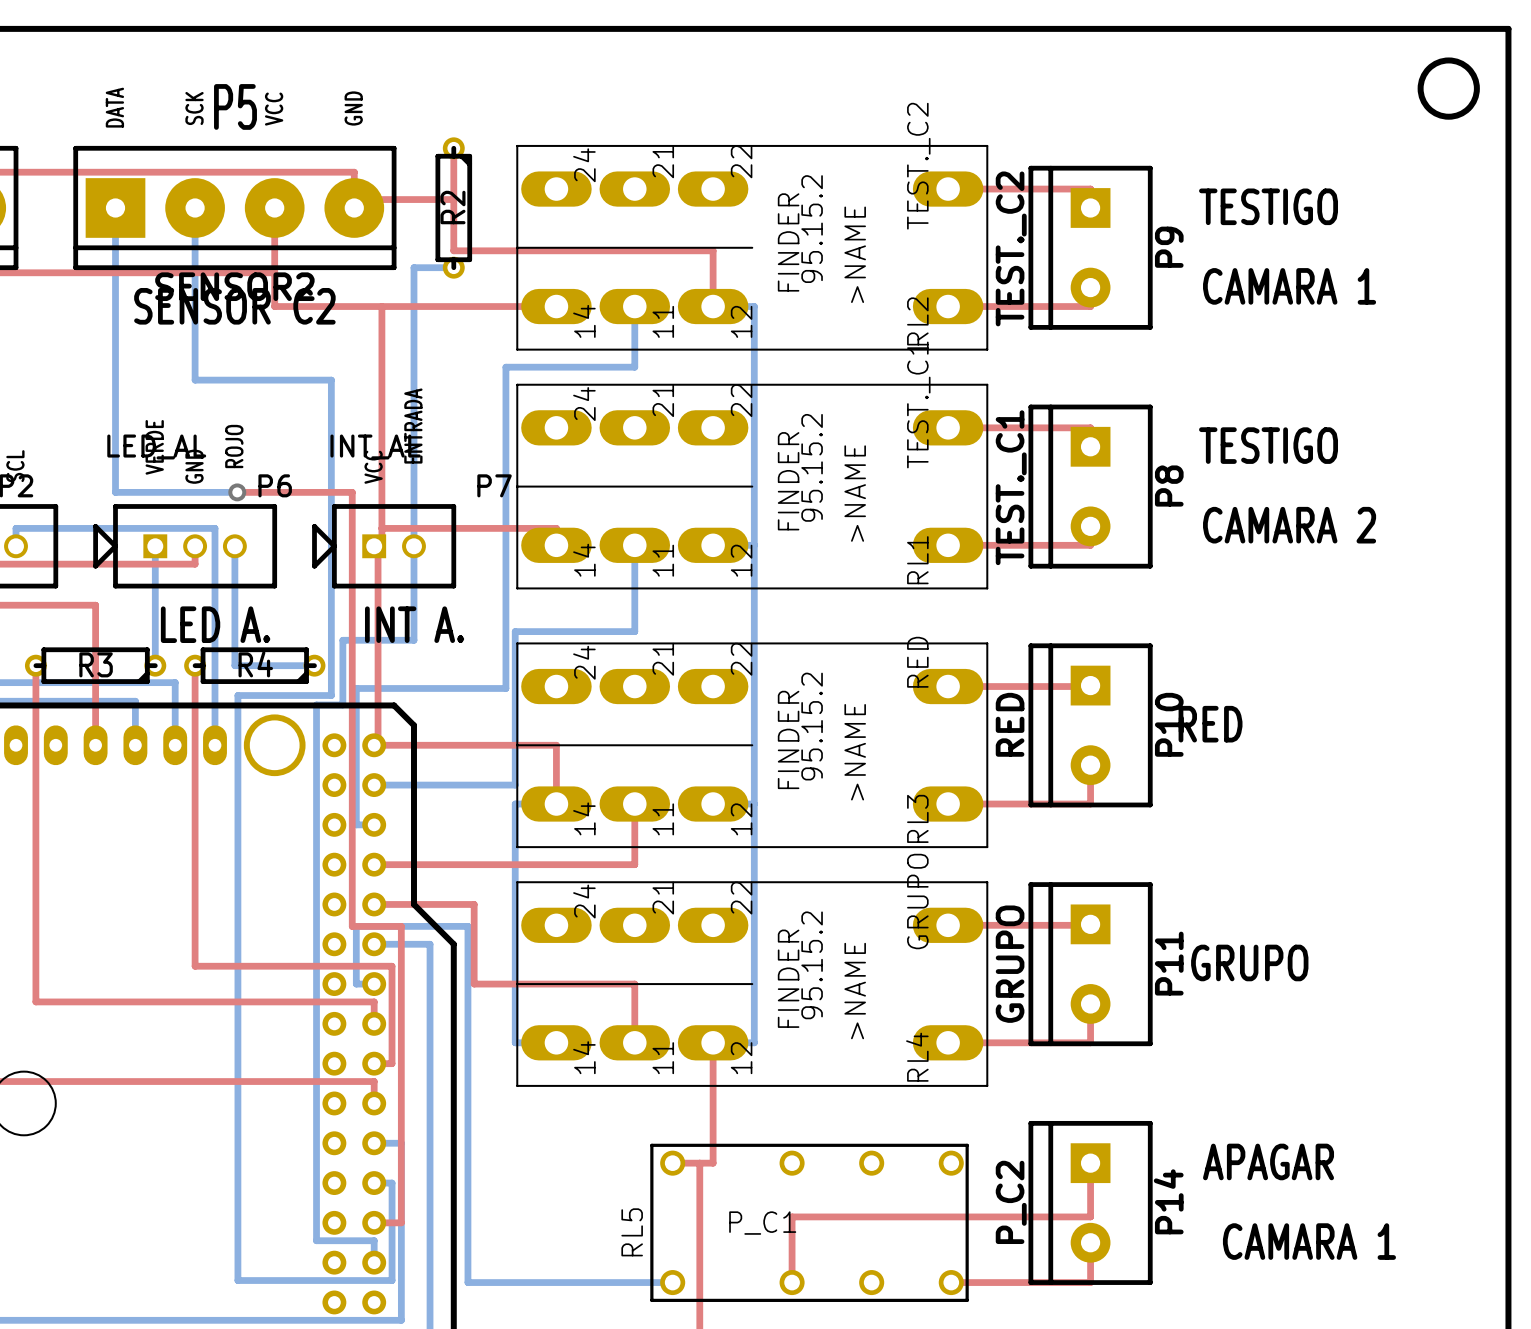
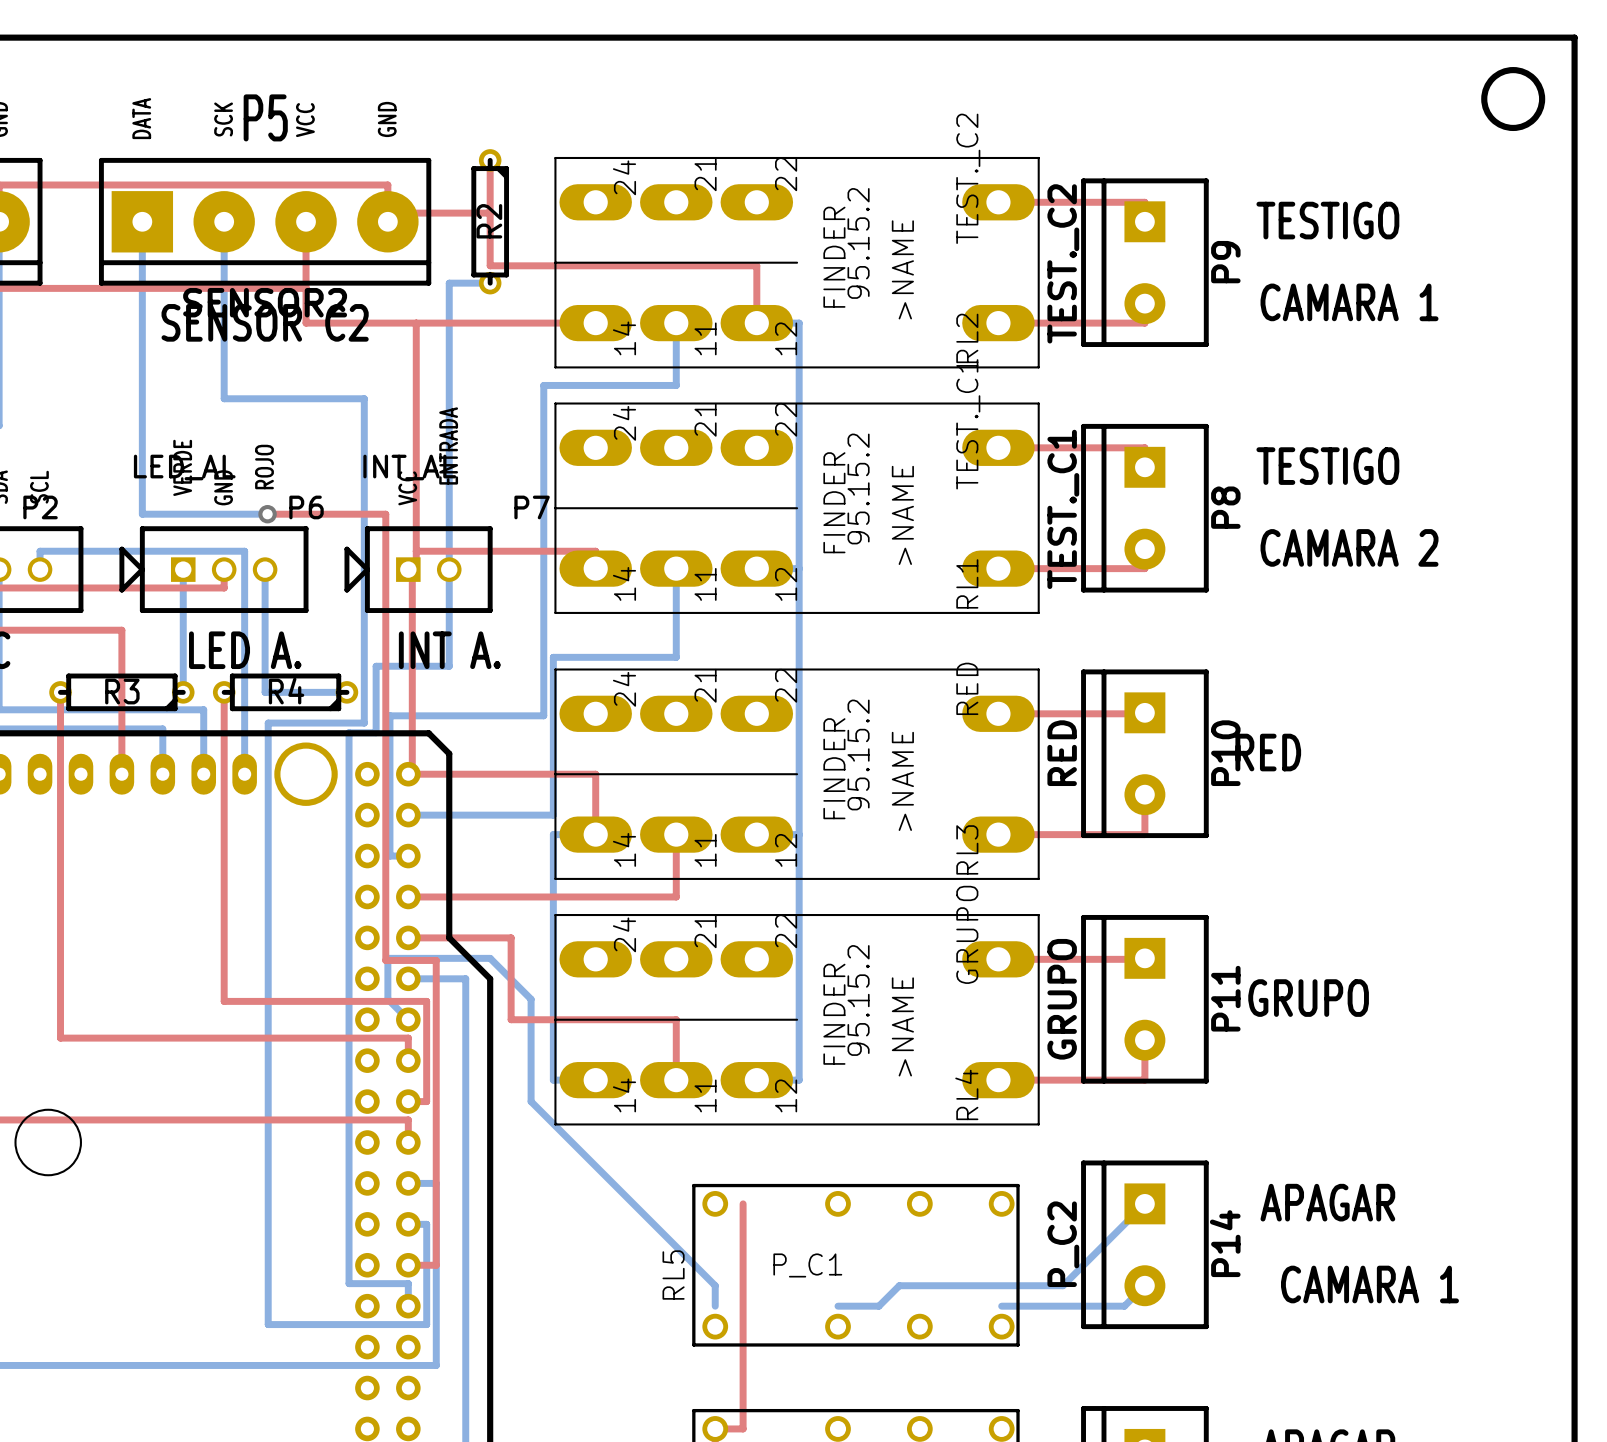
bottom track: (374, 984) (356, 984) (356, 926) (467, 926) (467, 1282) (672, 1282) -> (408, 1019) (387, 999) (387, 958) (490, 958) (531, 999) (531, 1101) (715, 1285) (715, 1306)
top track: (713, 1042) (713, 1163) (672, 1163) -> none
top track: (1090, 1163) (1090, 1216) (792, 1216) (792, 1282) -> none
bottom track: none -> (1144, 1203) (1063, 1285) (899, 1285) (878, 1306) (838, 1306)
top track: (1090, 1242) (1090, 1282) (951, 1282) -> none
bottom track: none -> (1144, 1285) (1124, 1306) (1001, 1306)

